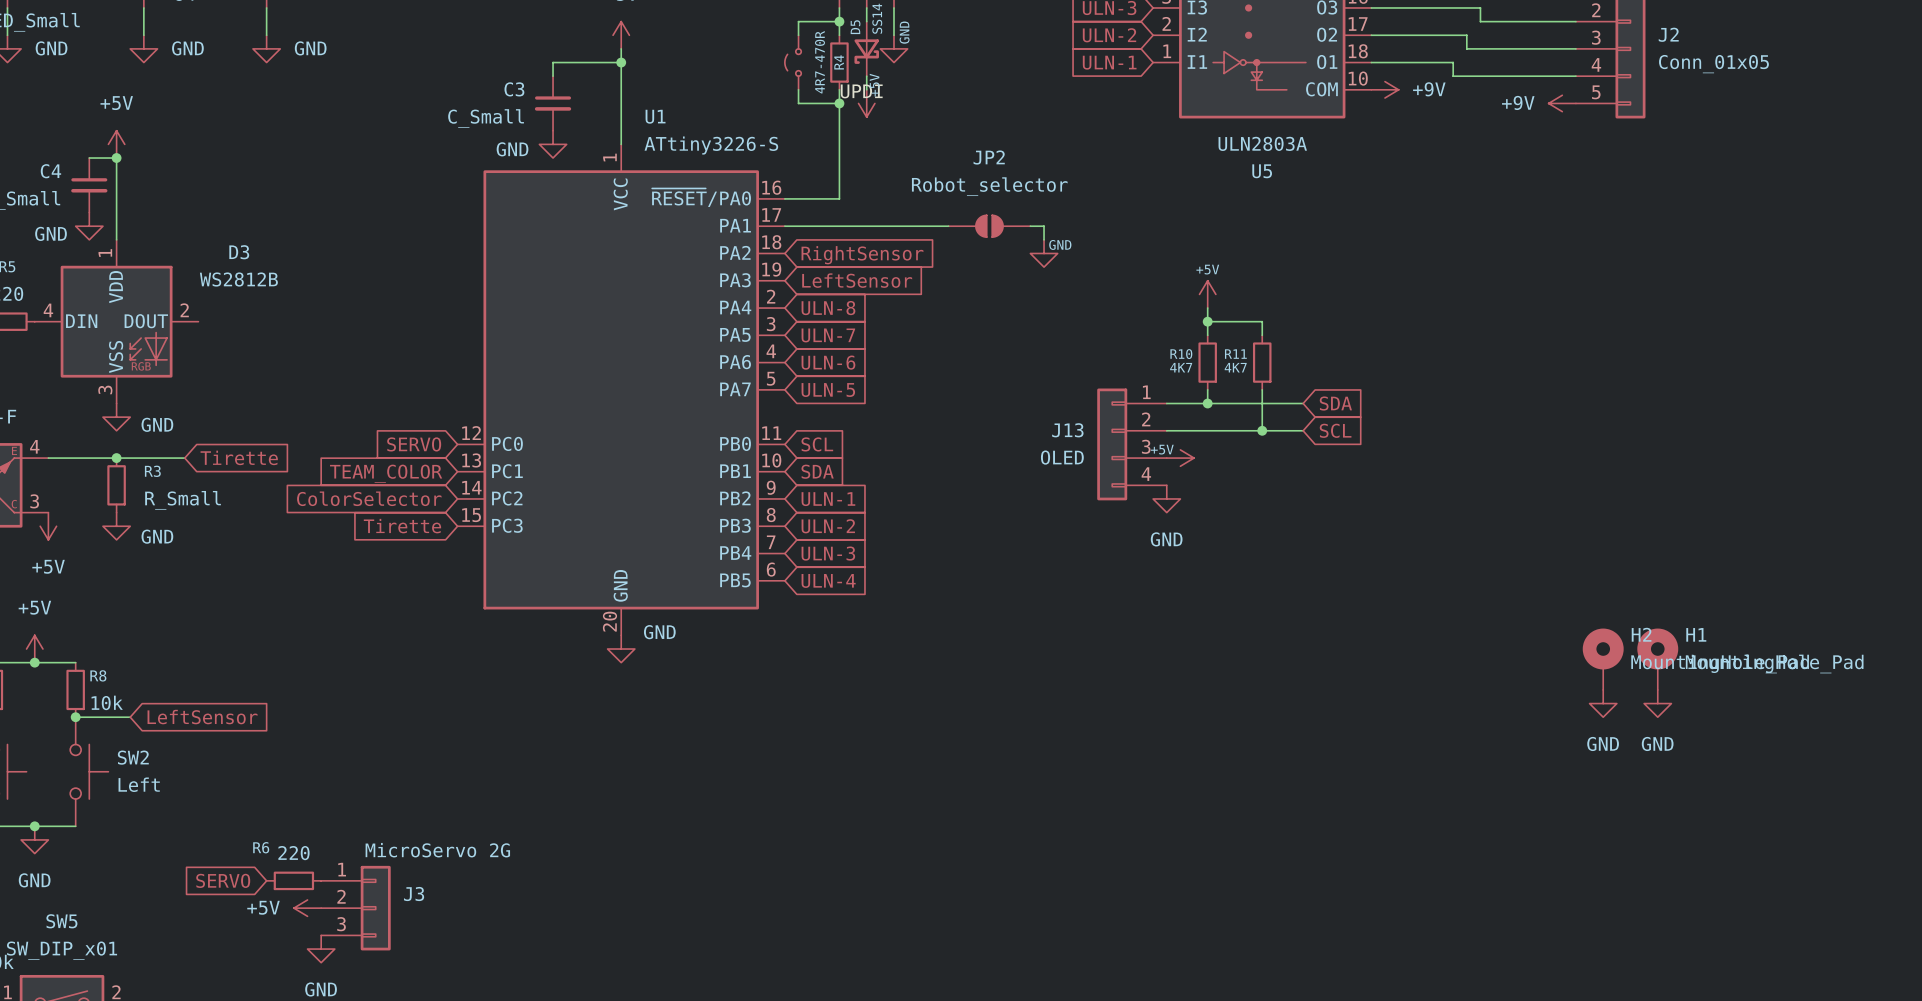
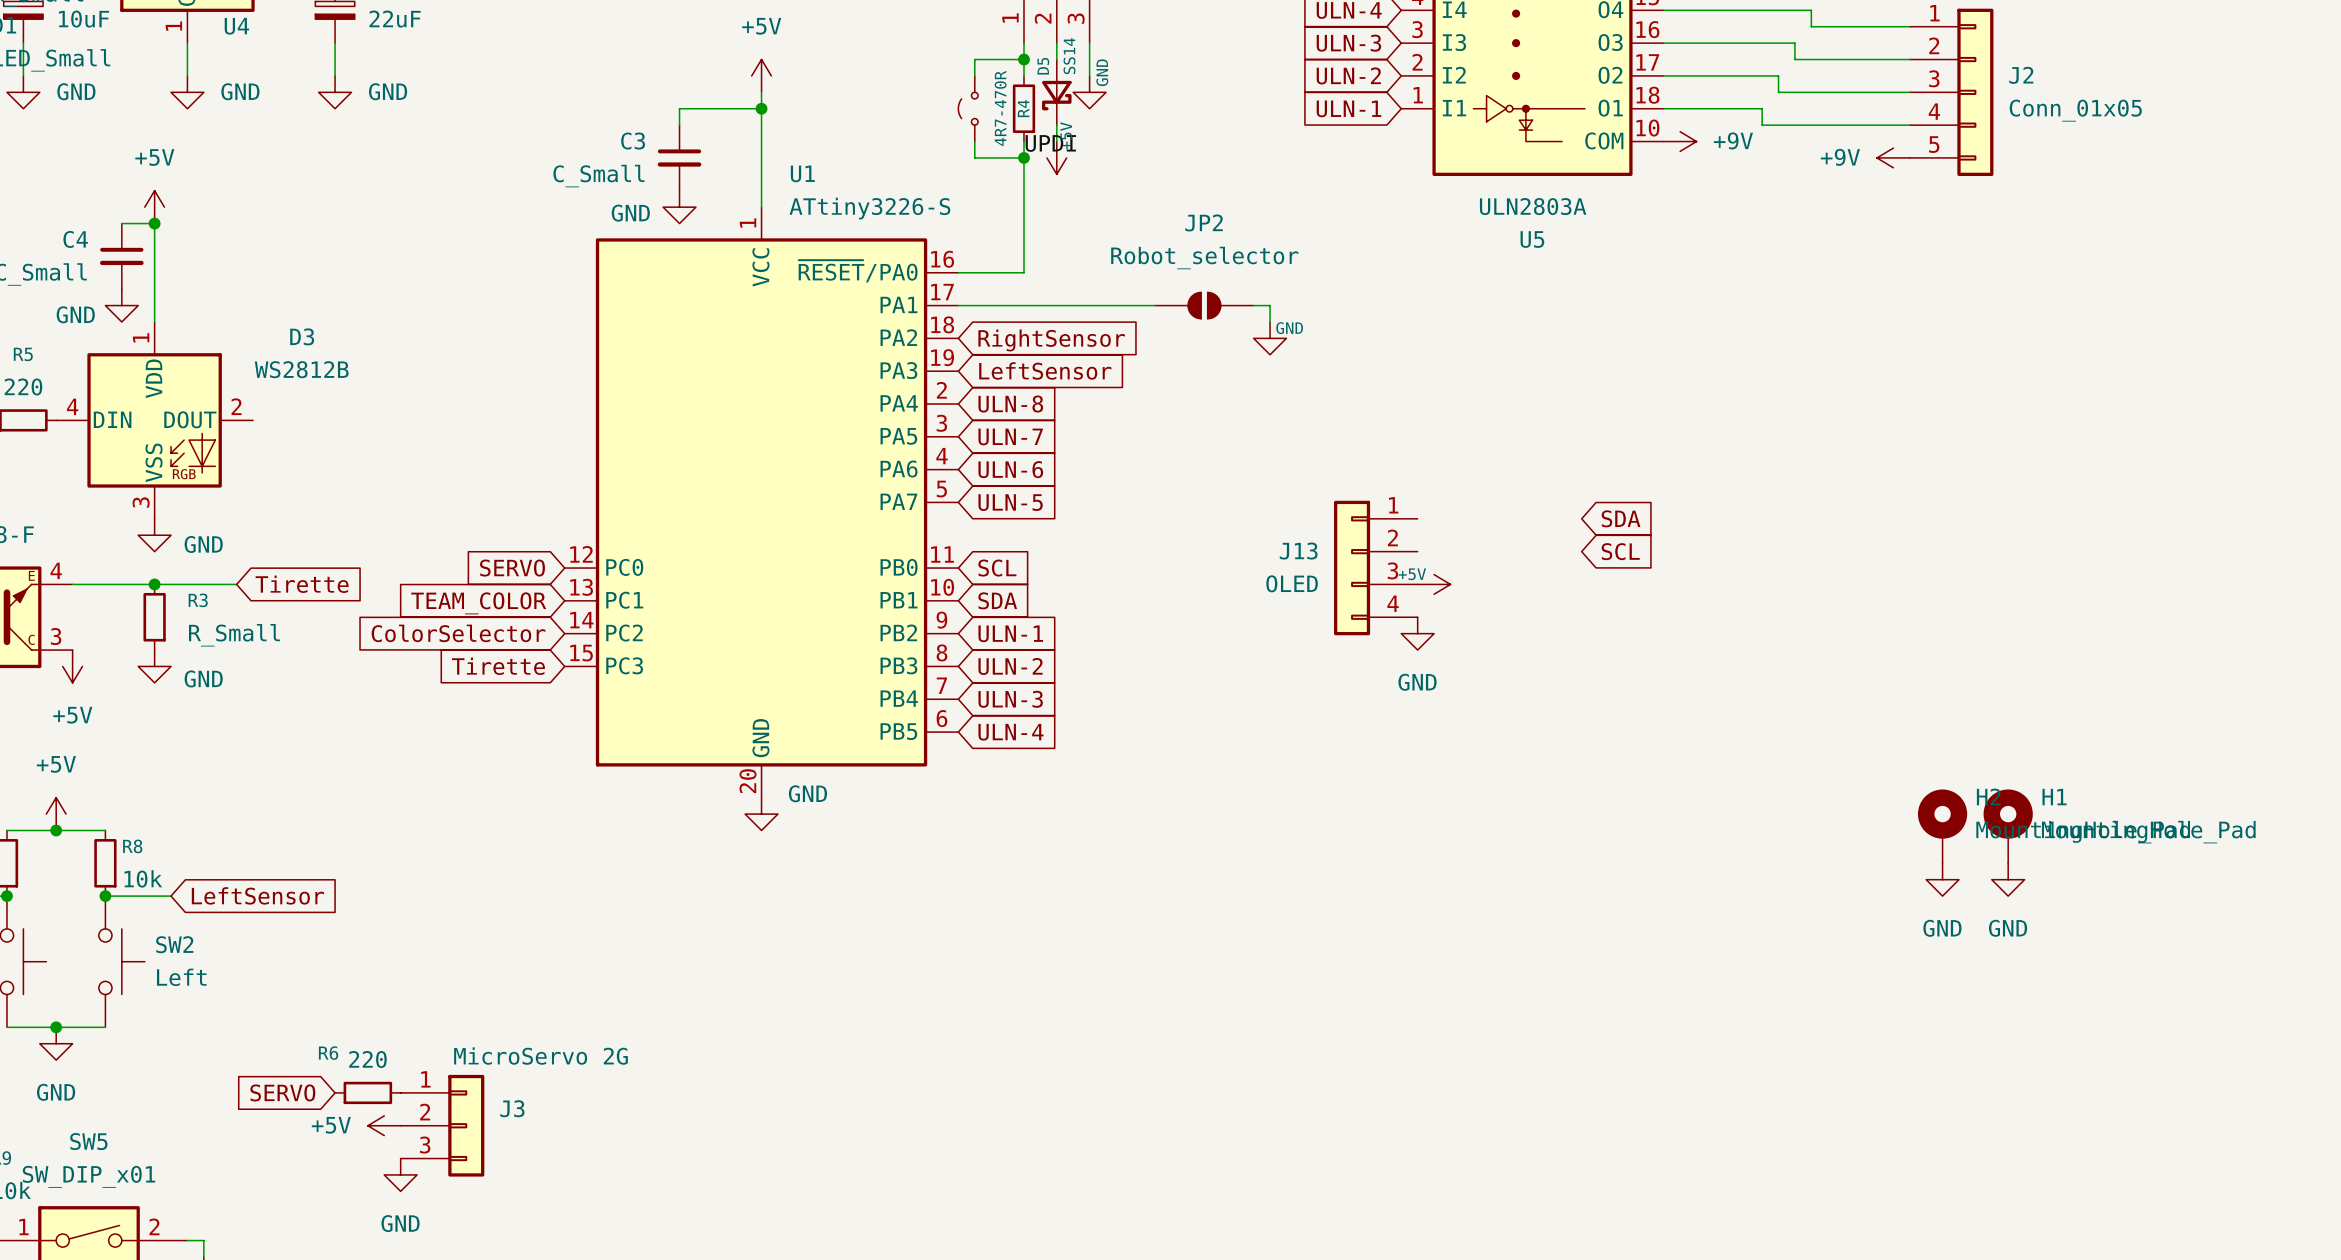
power symbol: +5V (1207, 294) -> none
wire: (1207, 308) (1207, 335) -> none
wire: (1207, 321) (1262, 321) (1262, 335) -> none
junction: (1207, 321) -> none
R10: 4K7 (1207, 362) -> none
R11: 4K7 (1262, 362) -> none
wire: (1207, 389) (1207, 403) -> none
wire: (1262, 389) (1262, 430) -> none
wire: (1166, 403) (1303, 403) -> none
junction: (1207, 403) -> none
wire: (1166, 430) (1303, 430) -> none
junction: (1262, 430) -> none

